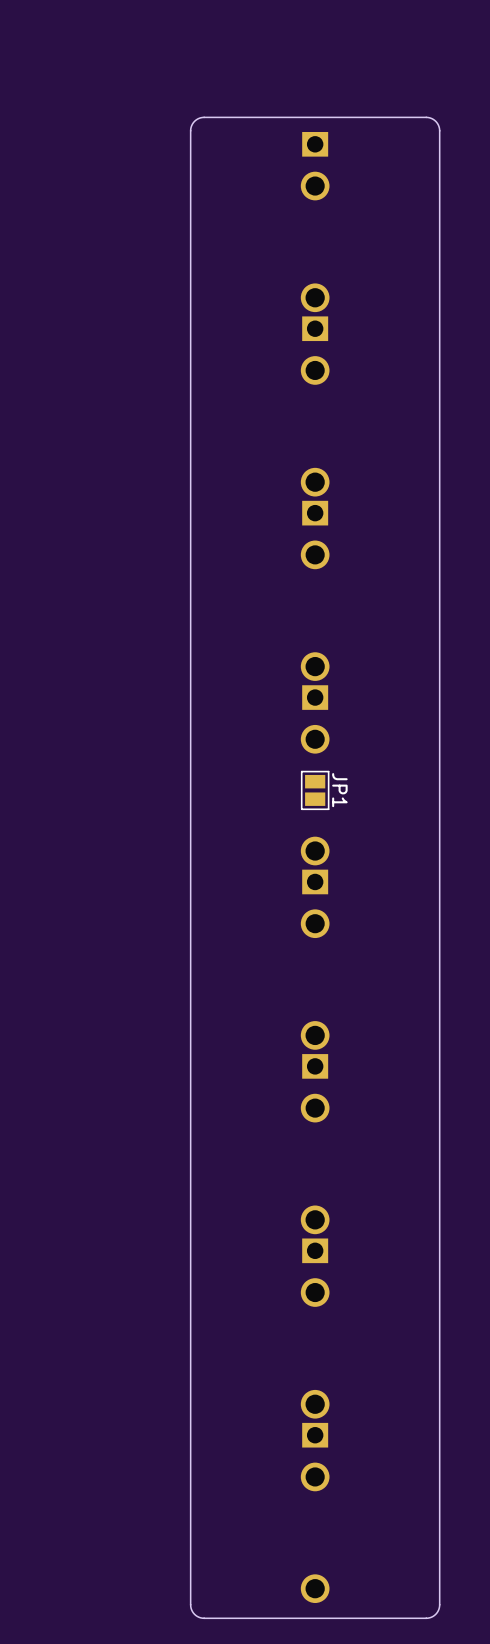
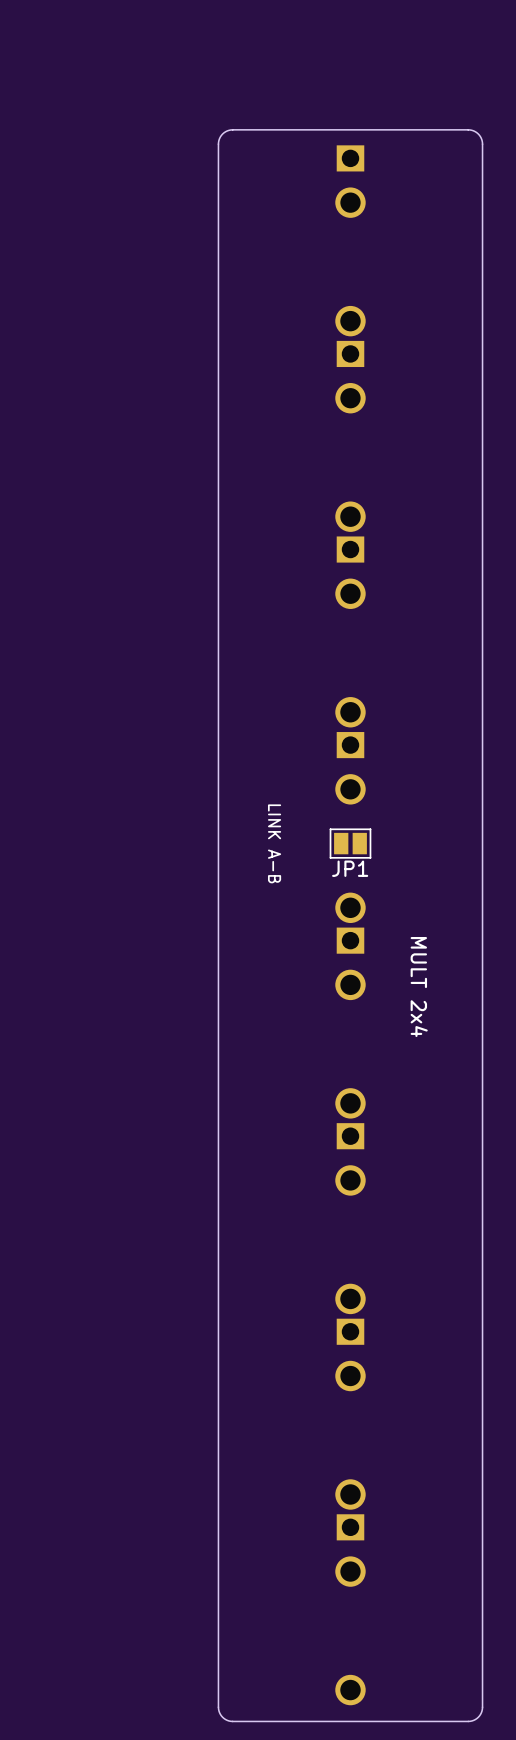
text: none -> LINK A-B (274, 843)
JP1 rotation: 0° (315, 790) -> 90° clockwise (350, 843)
text: none -> MULT 2x4 (419, 987)

